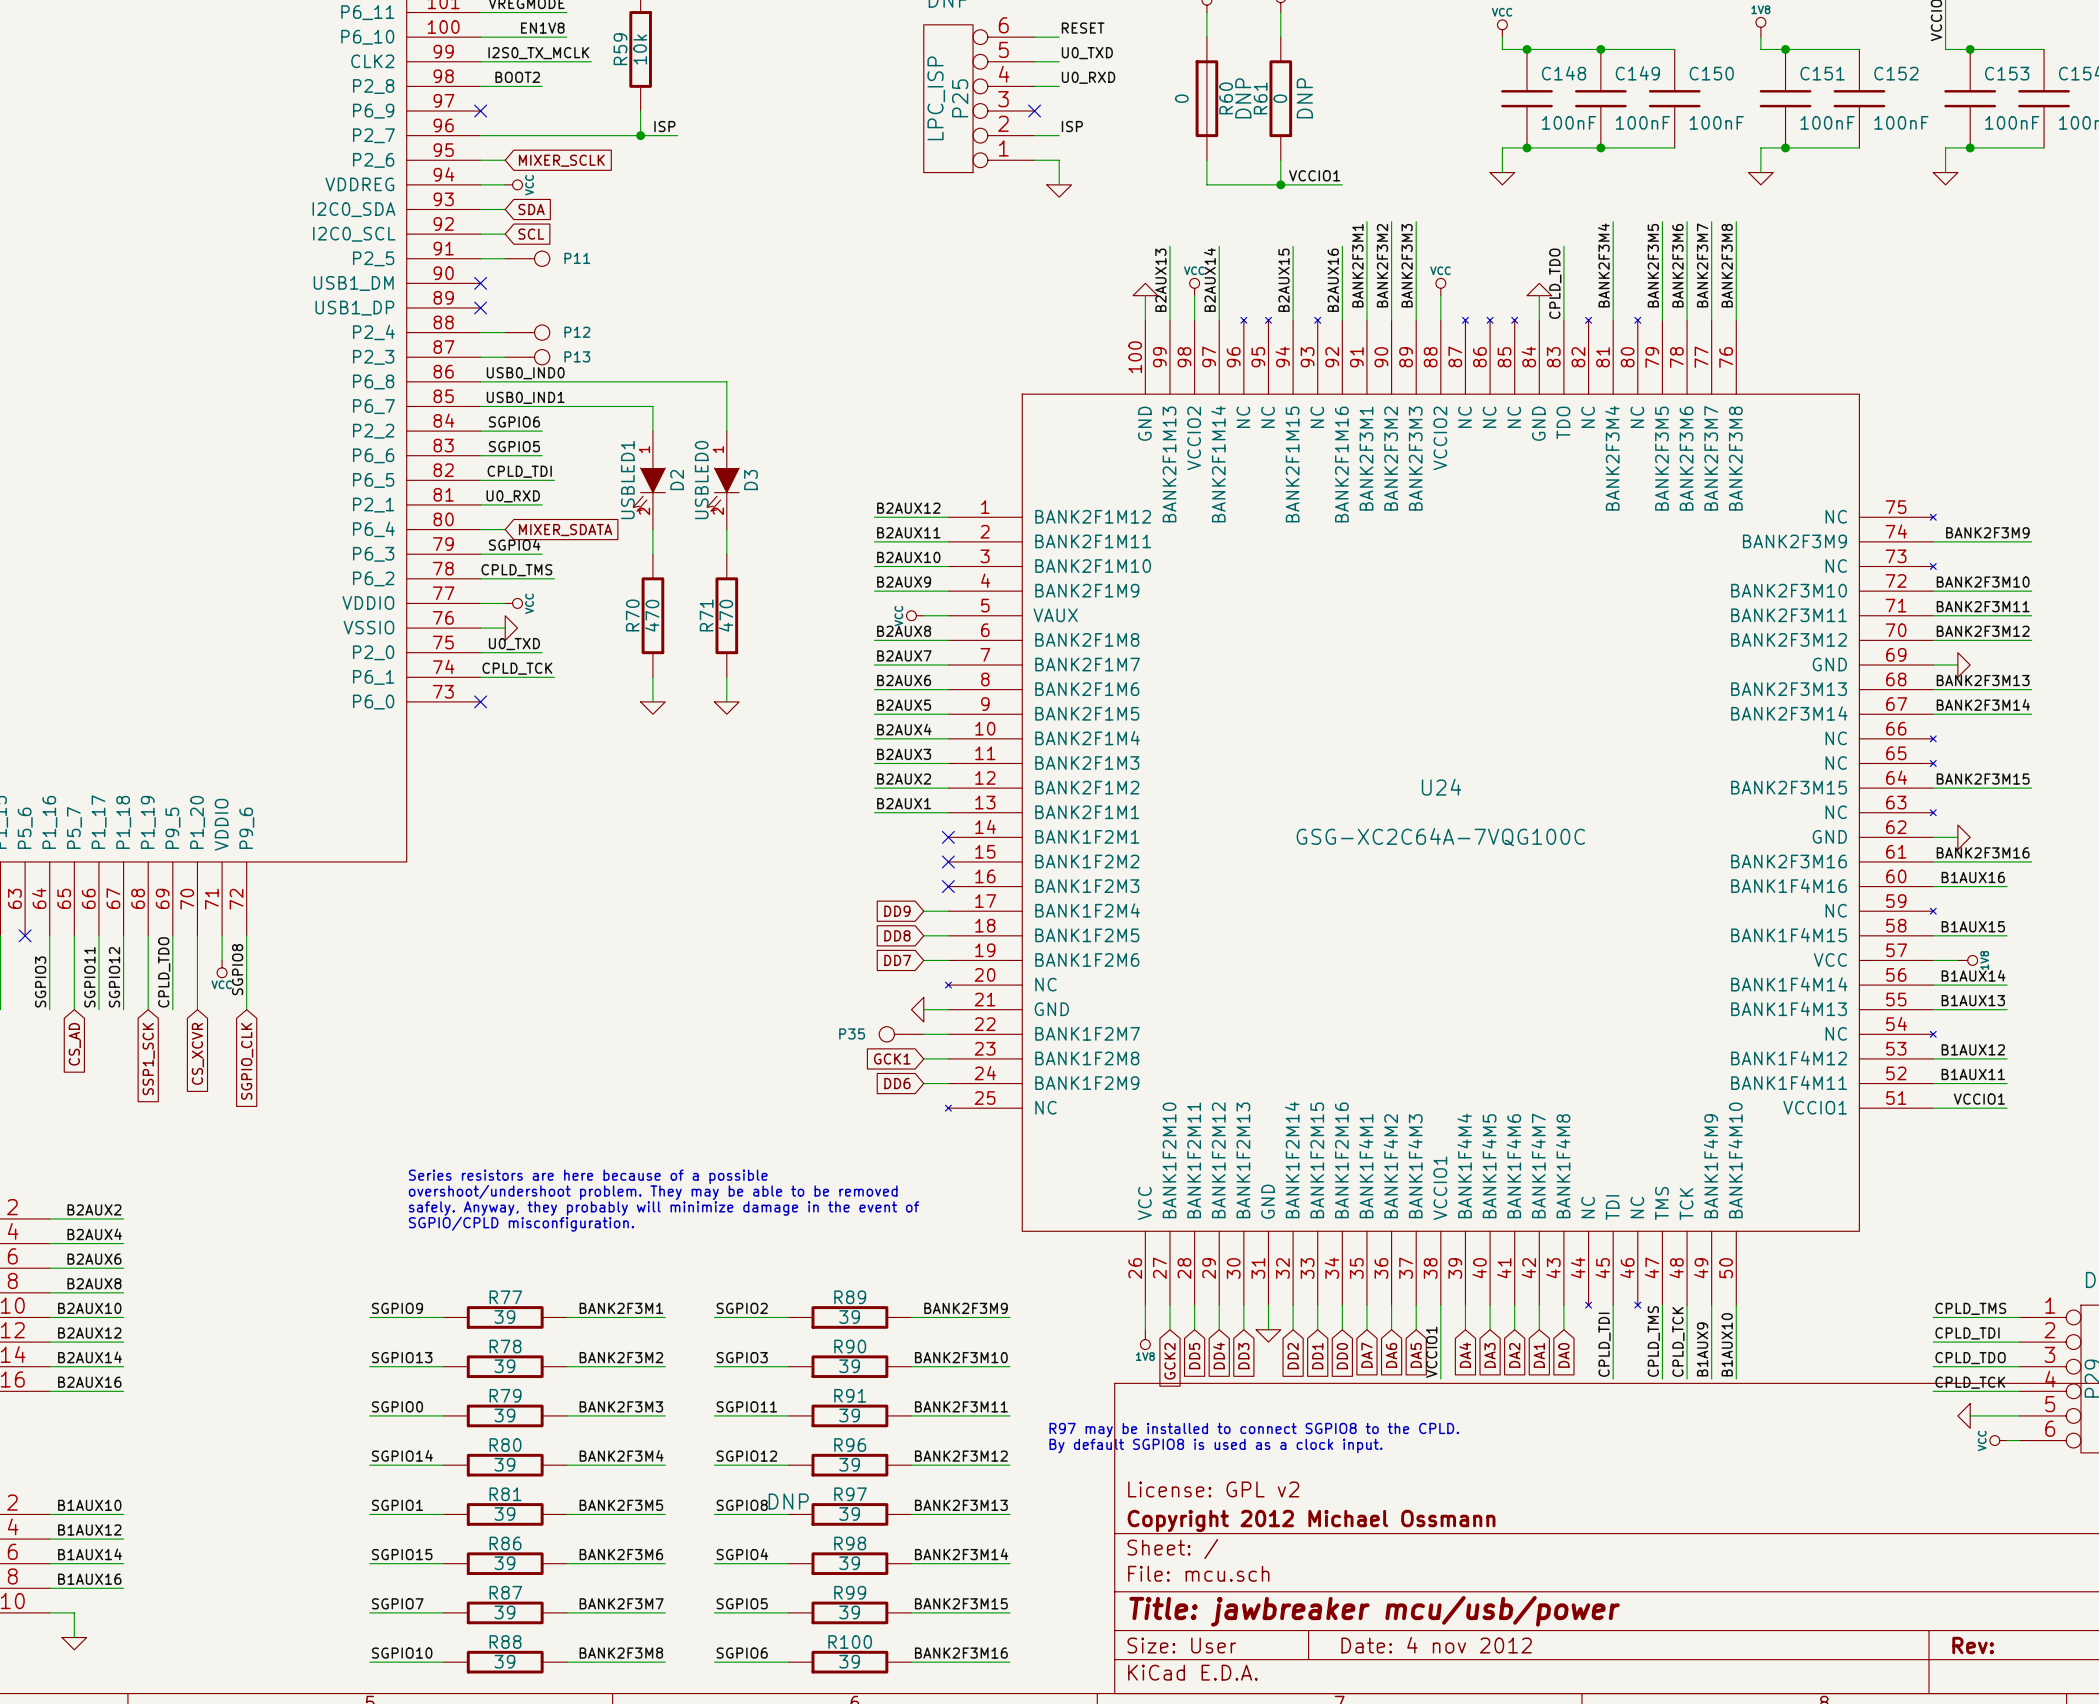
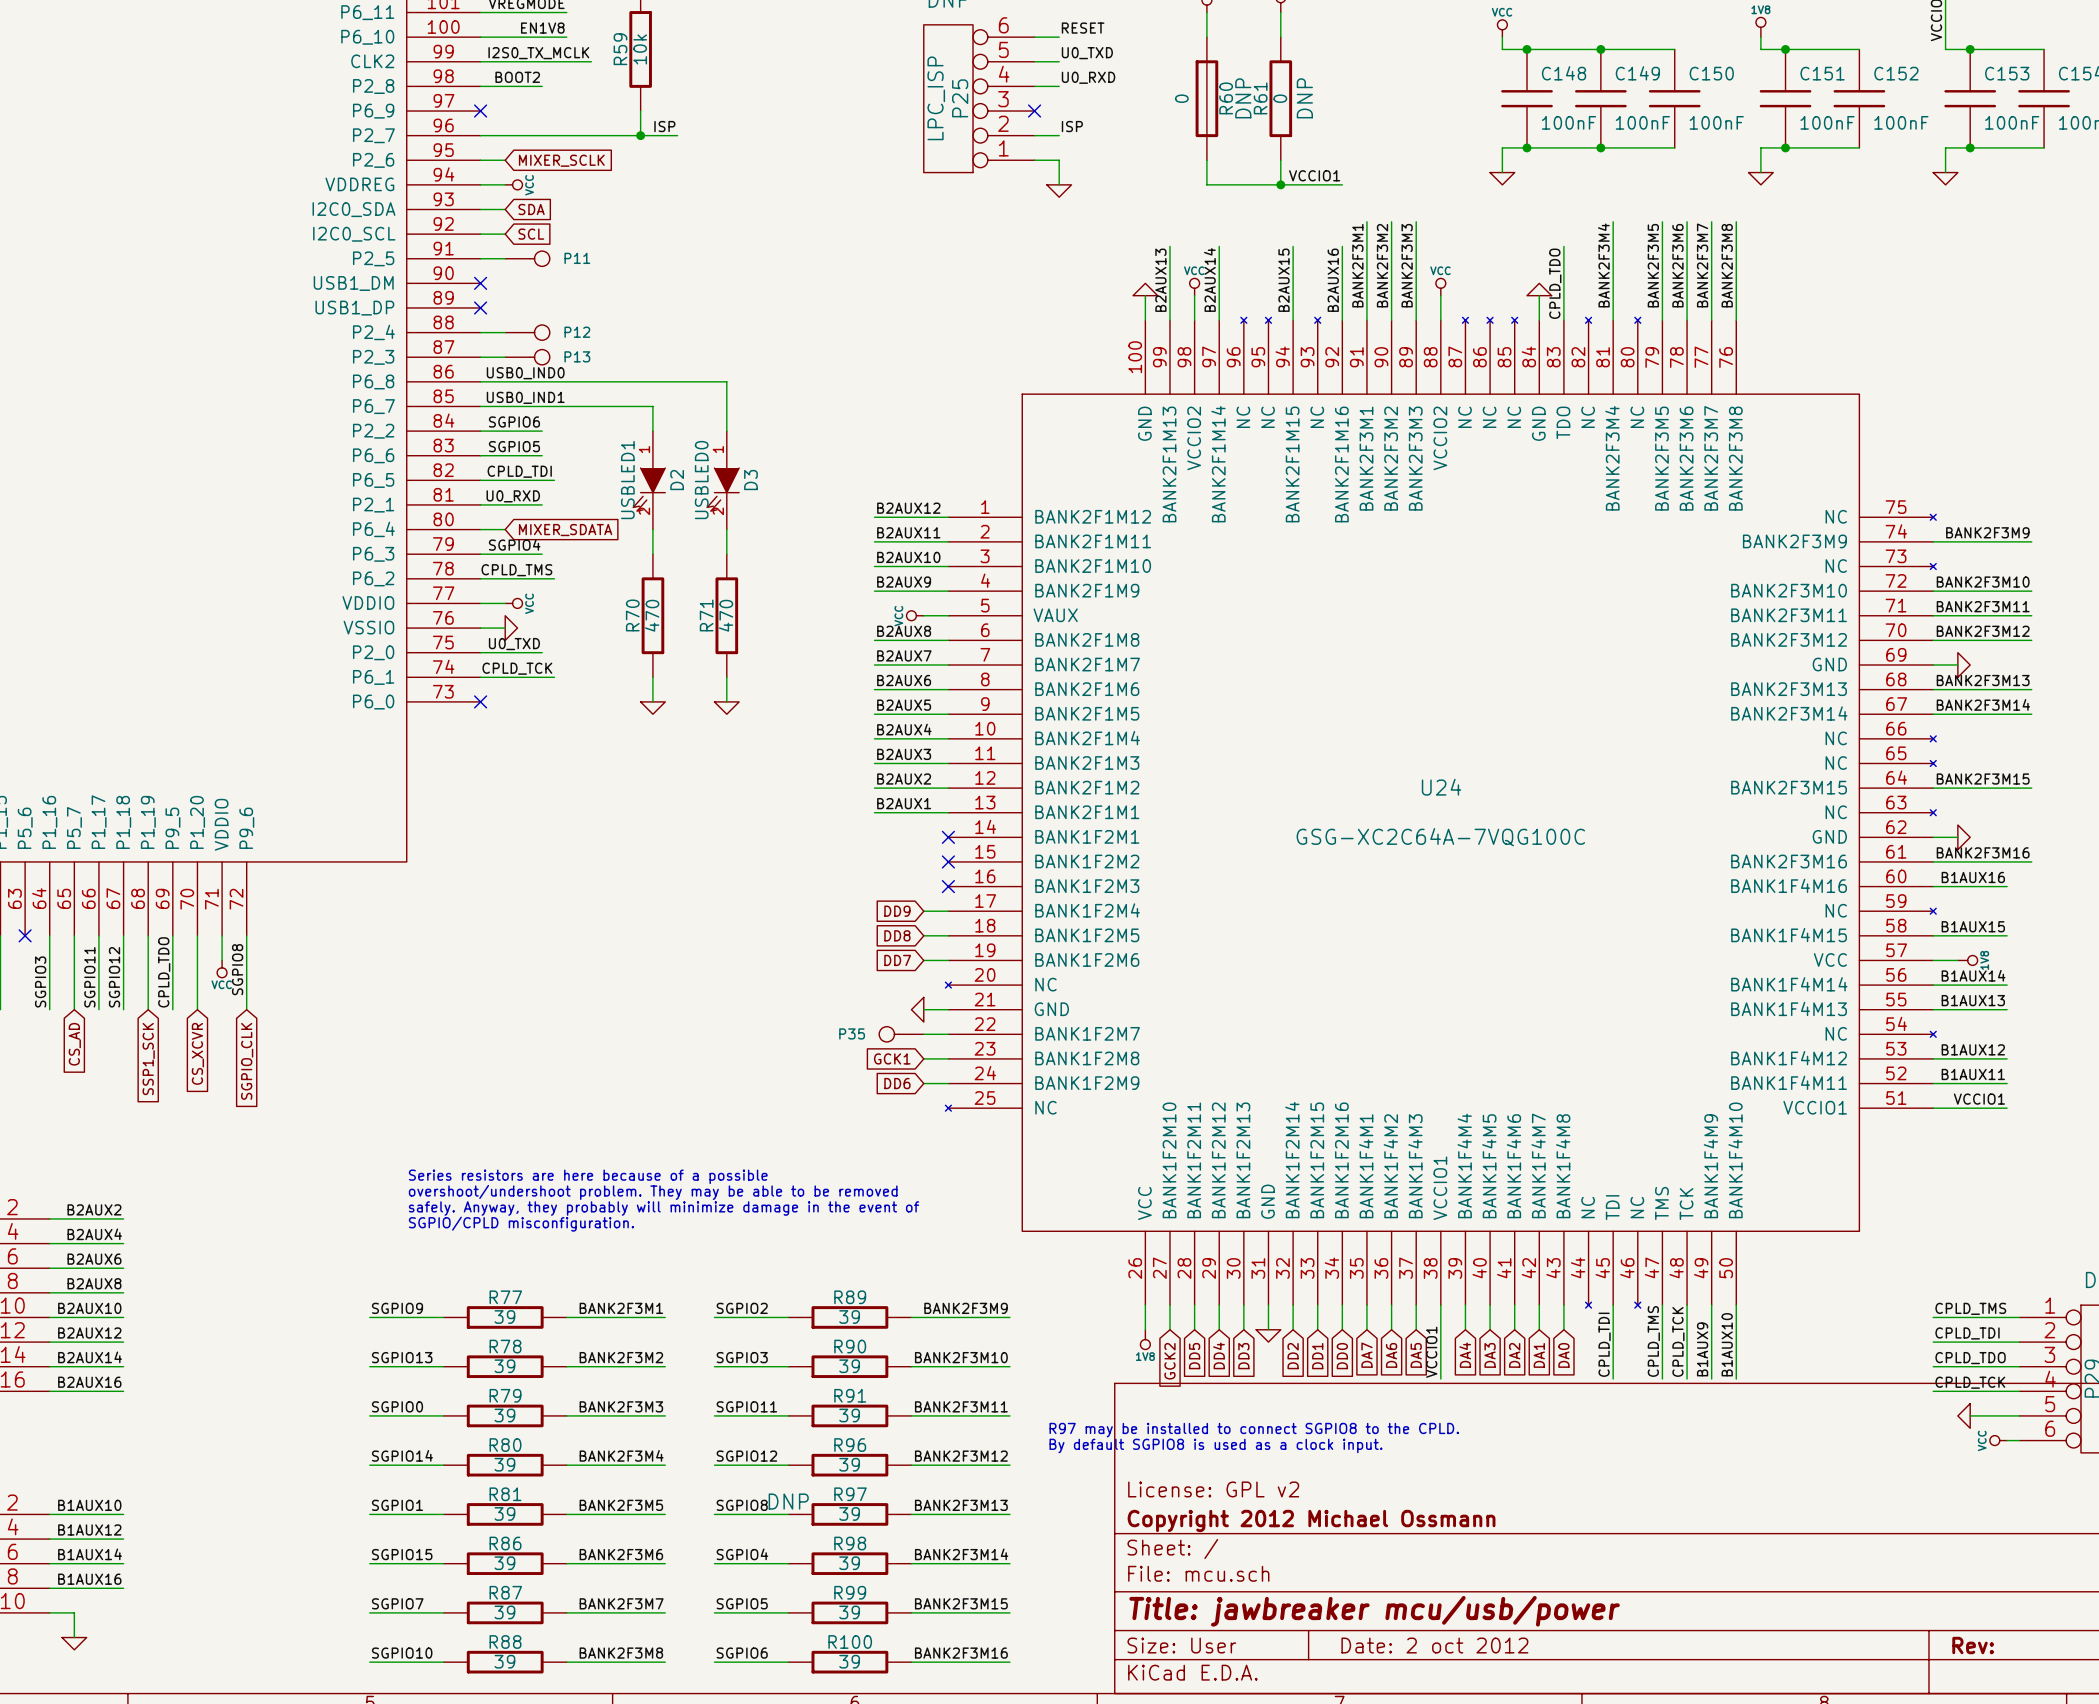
title block: Date: 4 nov 2012 (1436, 1645) -> Date: 2 oct 2012 (1434, 1645)

